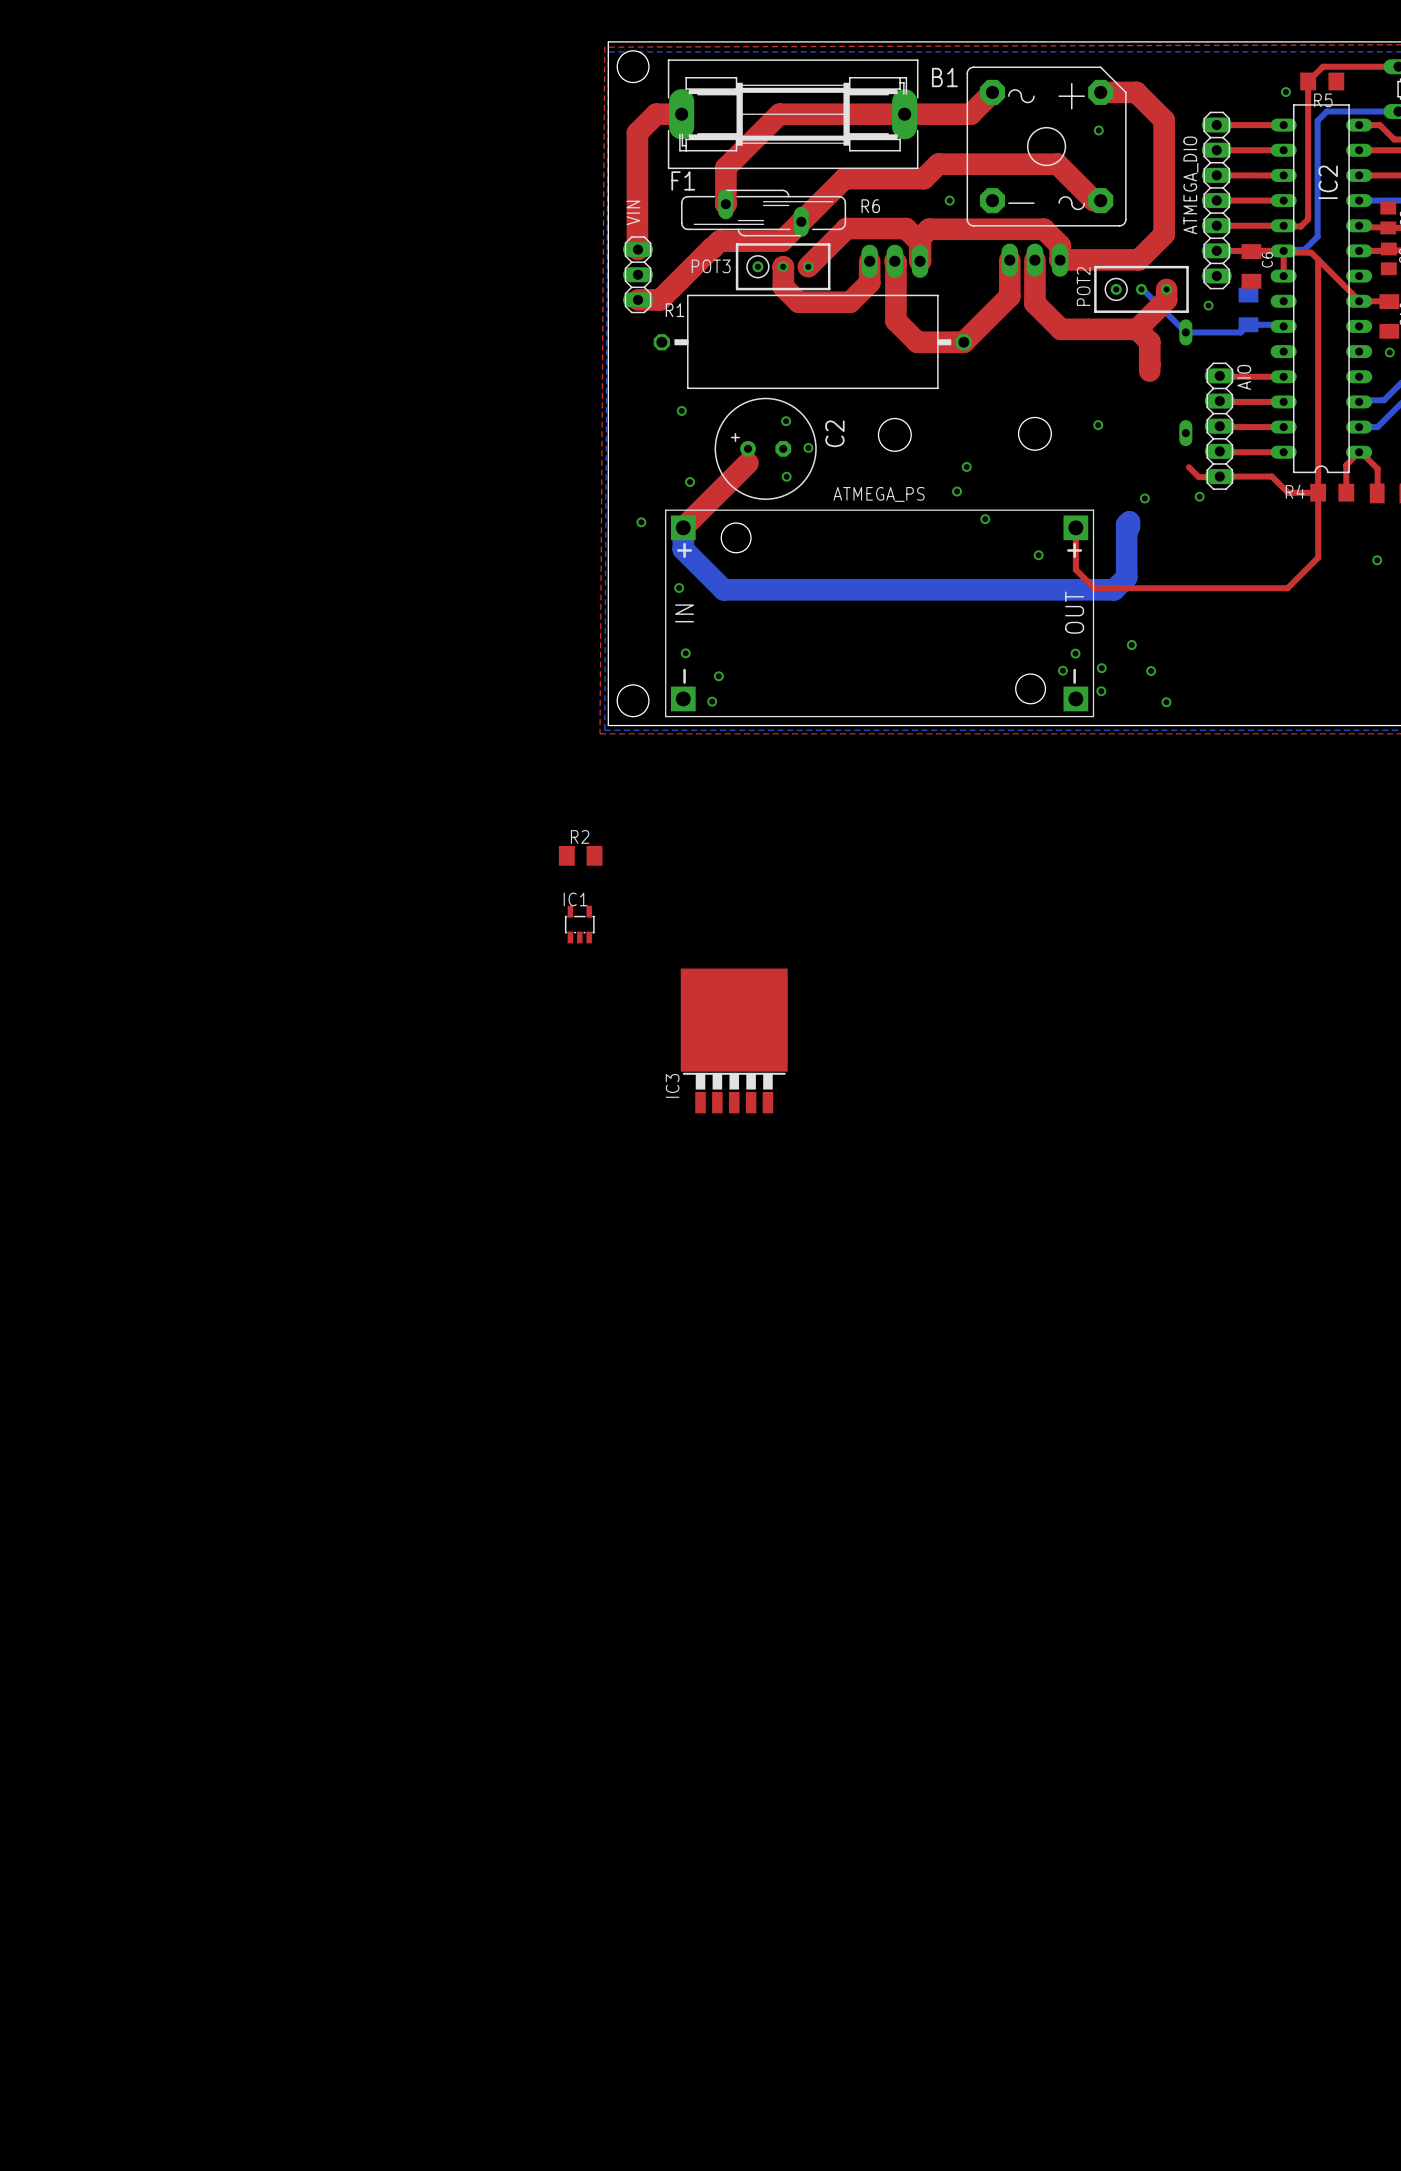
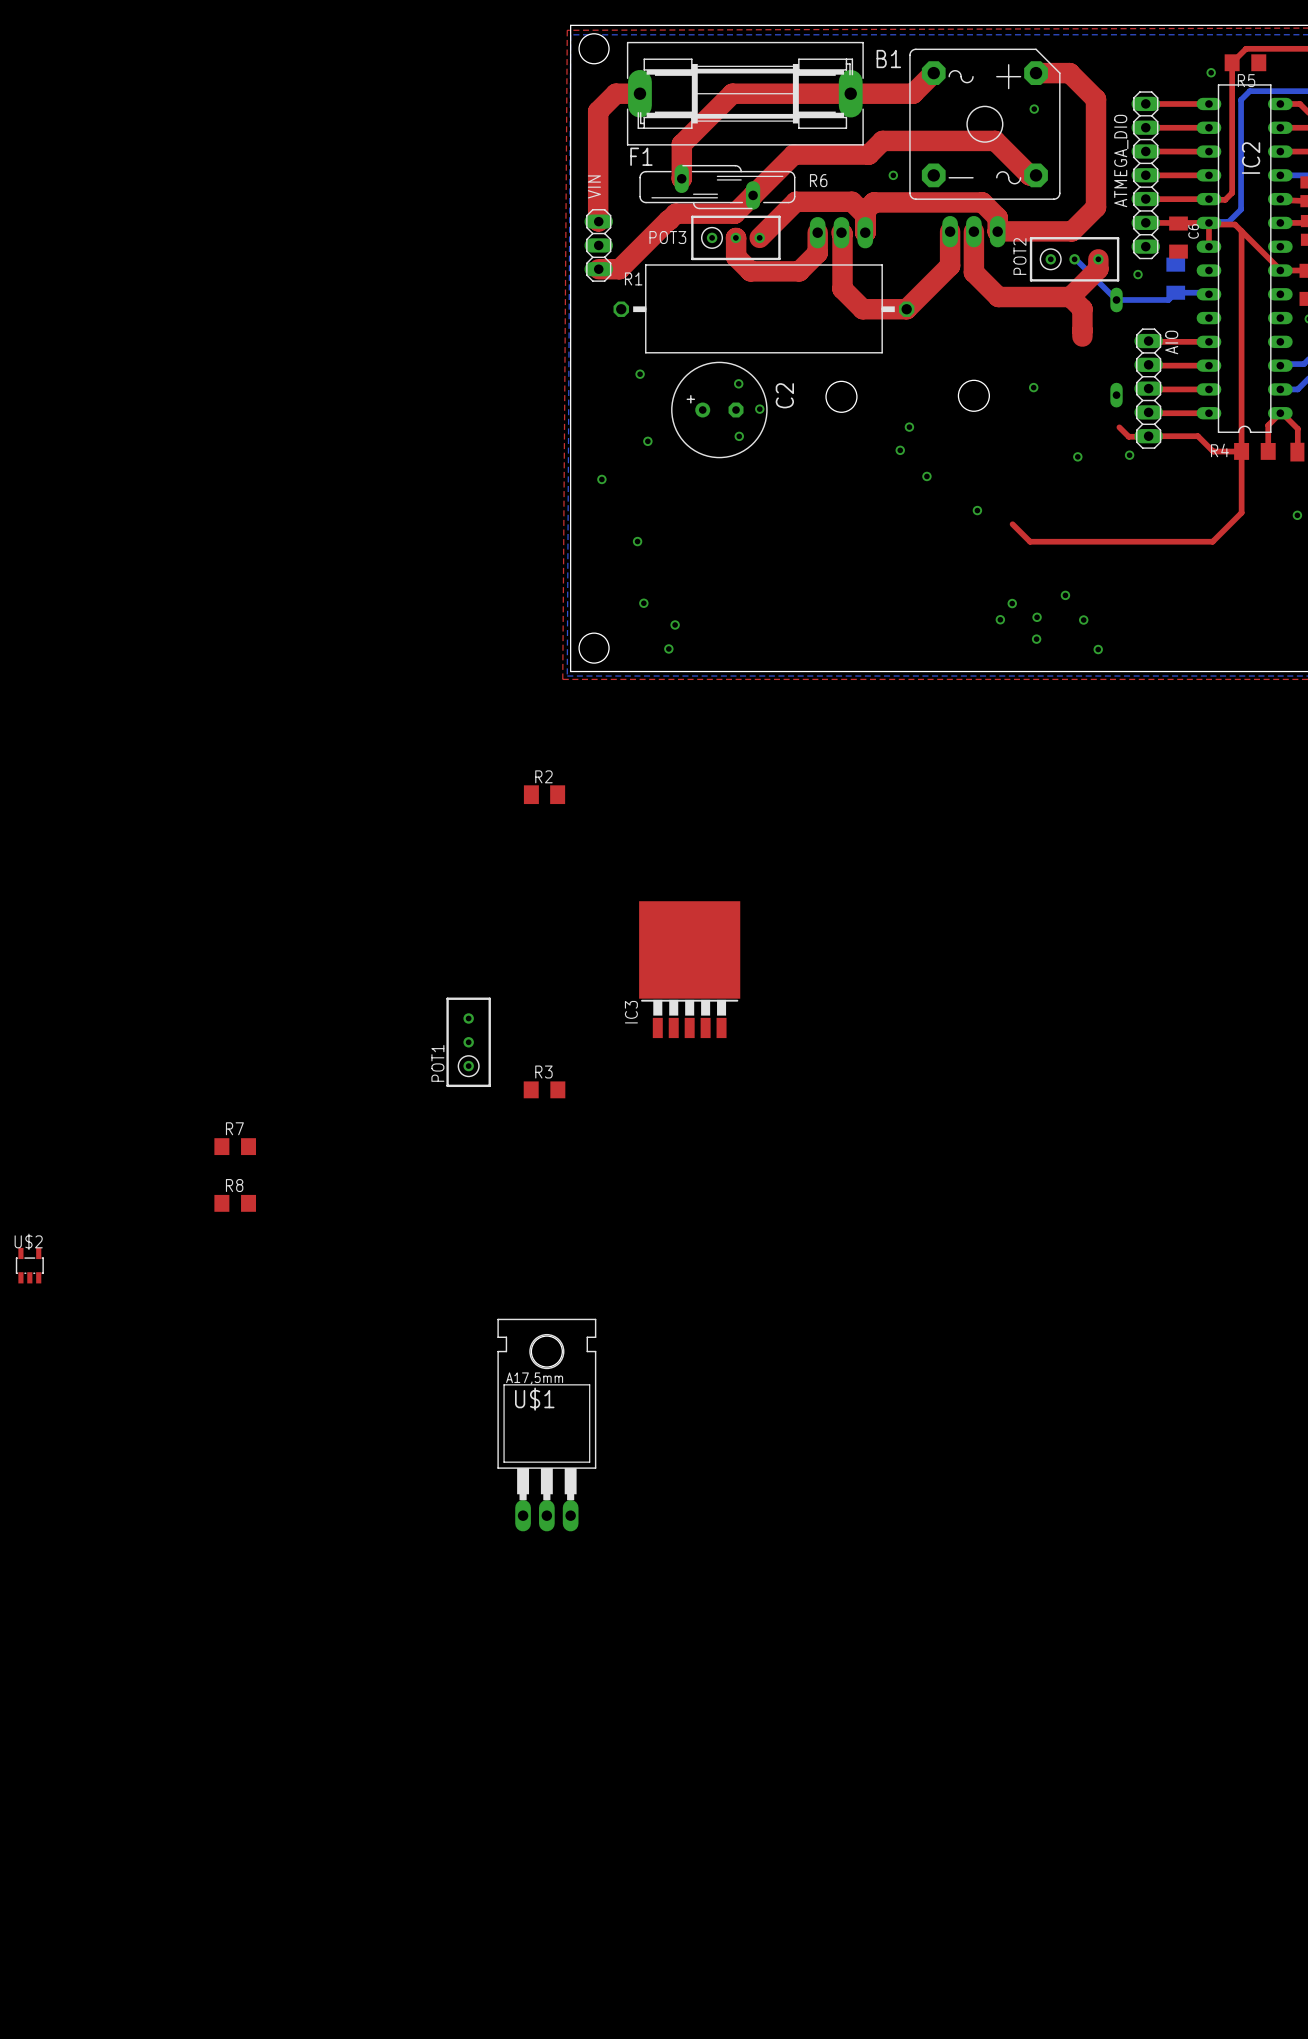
top track: (748, 463) (683, 527) -> none
top track: (1075, 527) (1075, 569) -> none
bottom track: (1129, 527) (1129, 521) (1126, 524) (1126, 577) (1114, 589) (723, 589) (683, 549) (683, 527) -> none
ATMEGA_PS: (879, 613) -> none
IC1: (579, 924) -> none
POT1: none -> (468, 1042)
R3: none -> (544, 1089)
R7: none -> (235, 1146)
R8: none -> (235, 1203)
U$2: none -> (29, 1265)
U$1: none -> (546, 1425)

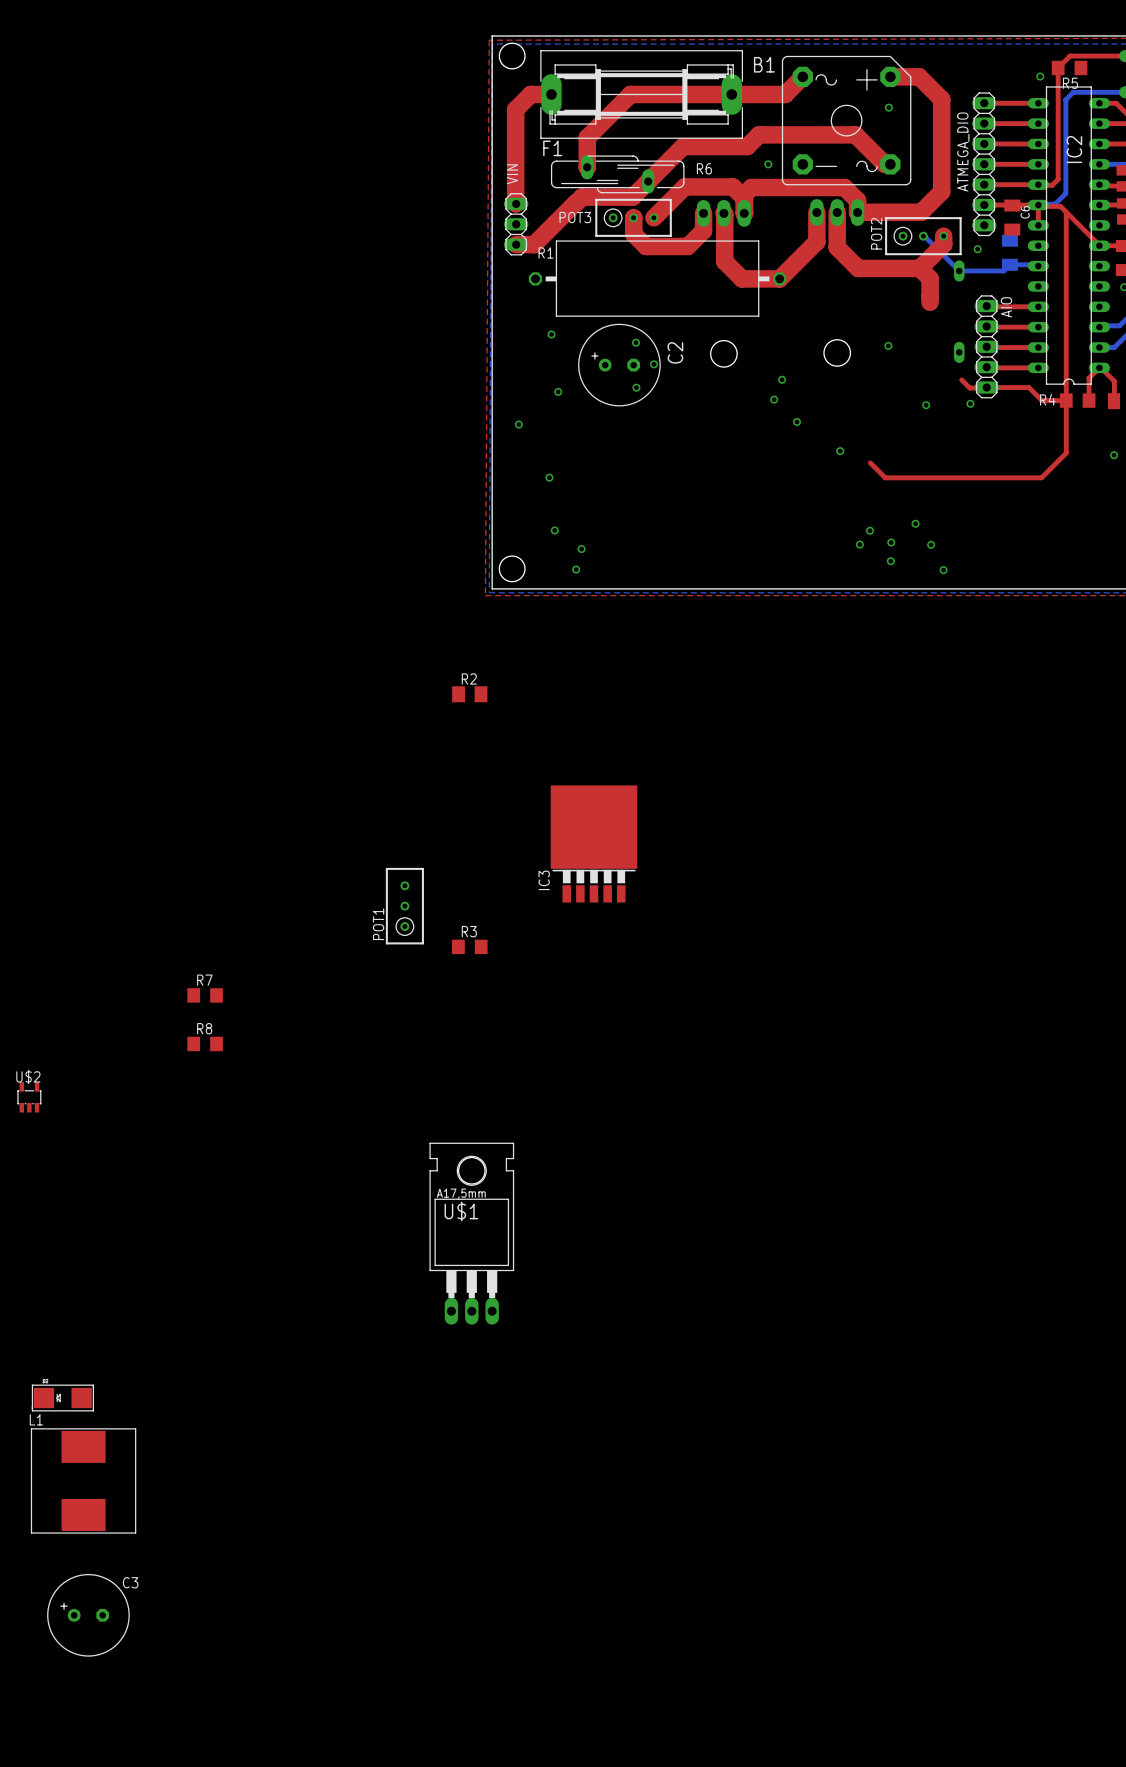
part: none -> (62, 1398)
L1: none -> (83, 1480)
C3: none -> (88, 1615)

